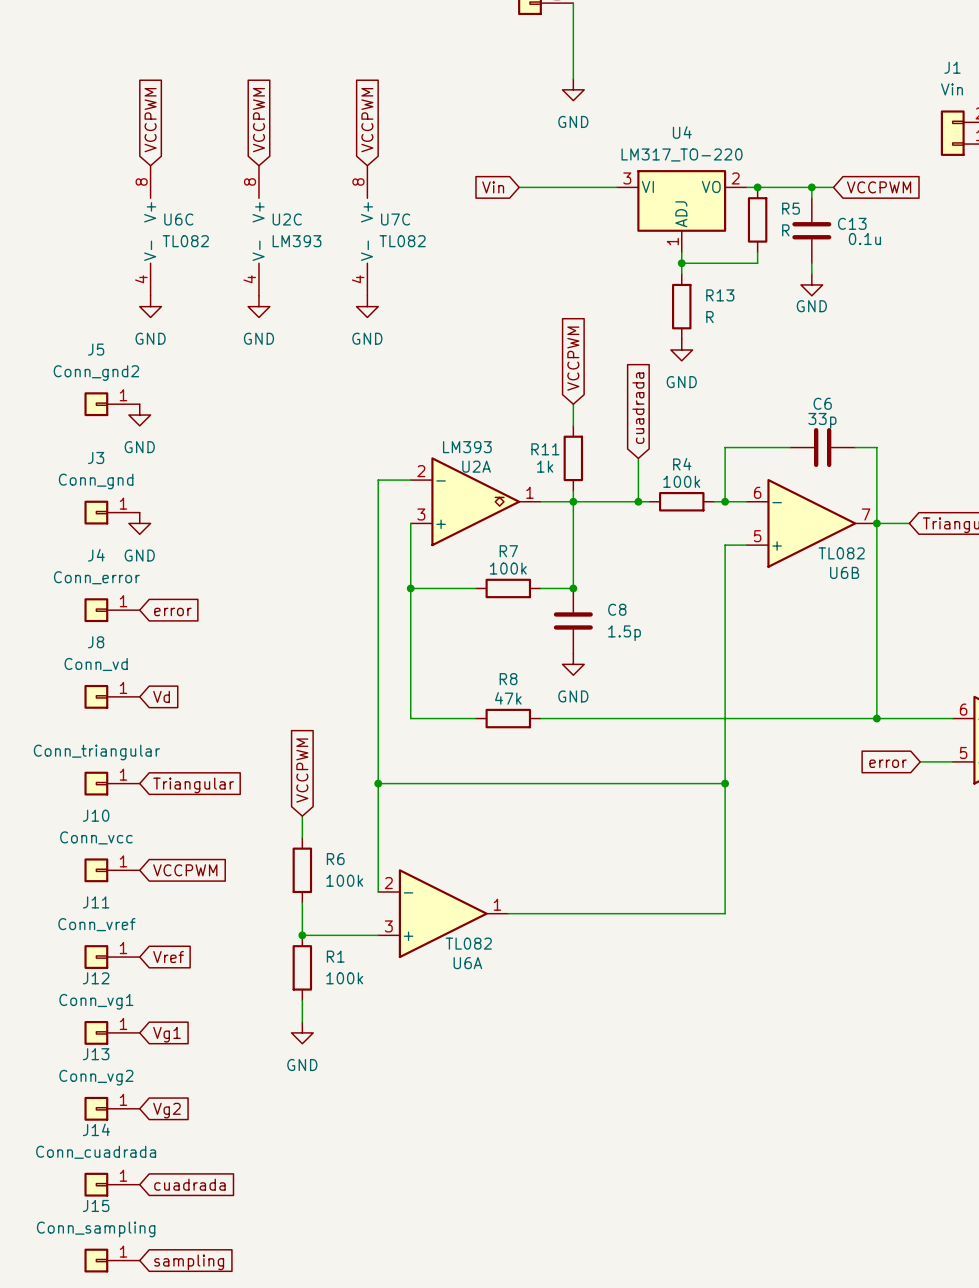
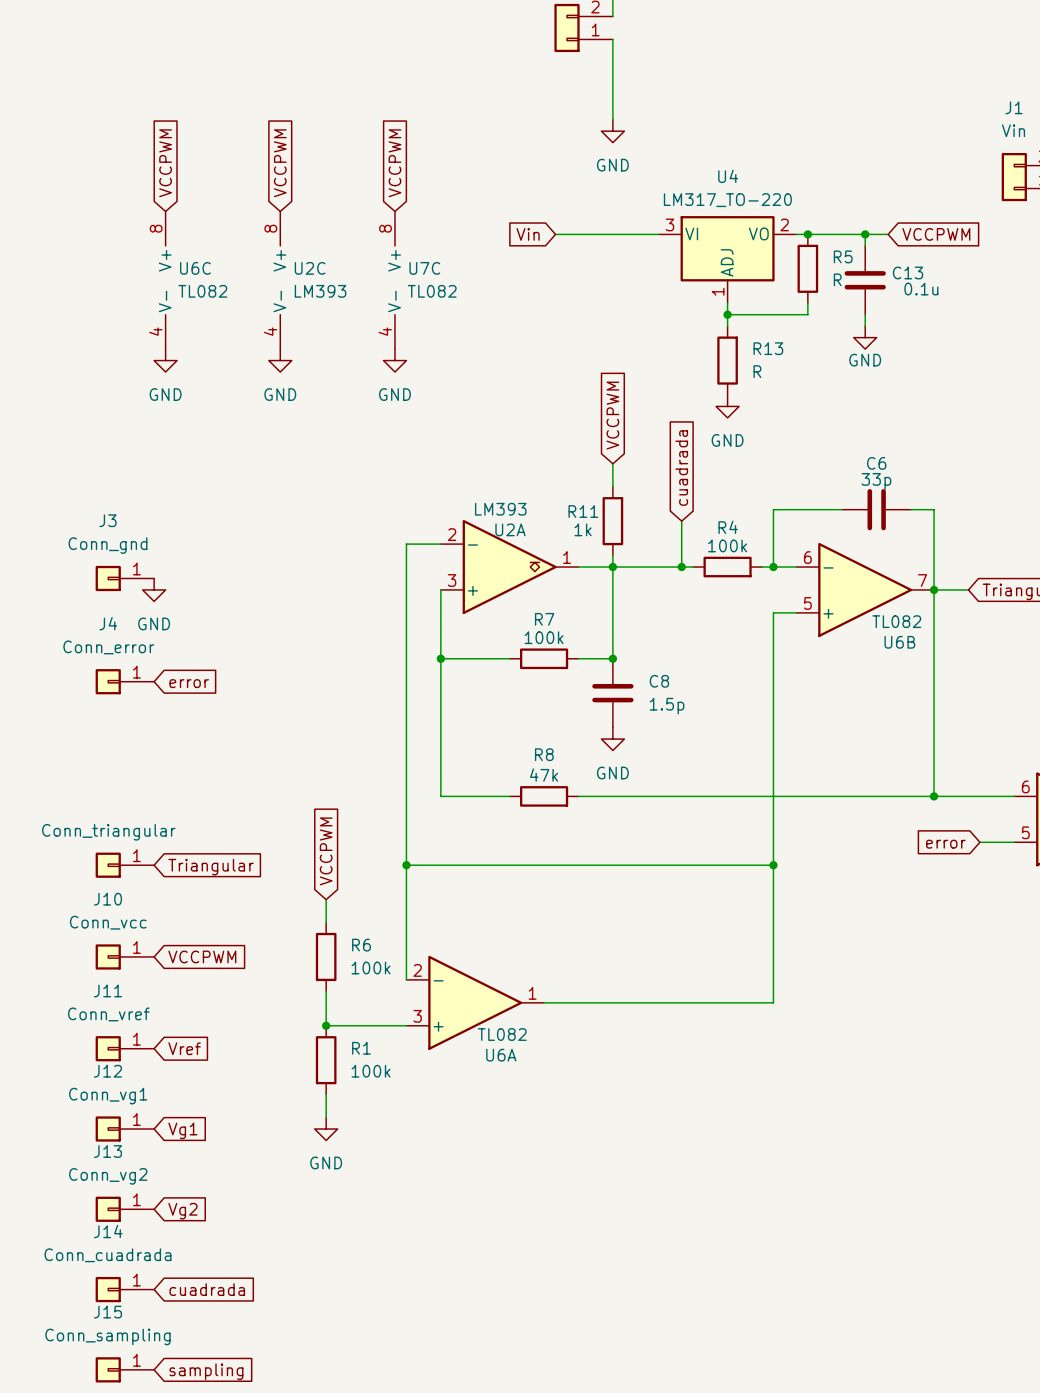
J5: Conn_gnd2 (112, 404) -> none
power symbol: GND (139, 415) -> none
J8: Conn_vd (112, 696) -> none
global label: Vd (161, 696) -> none

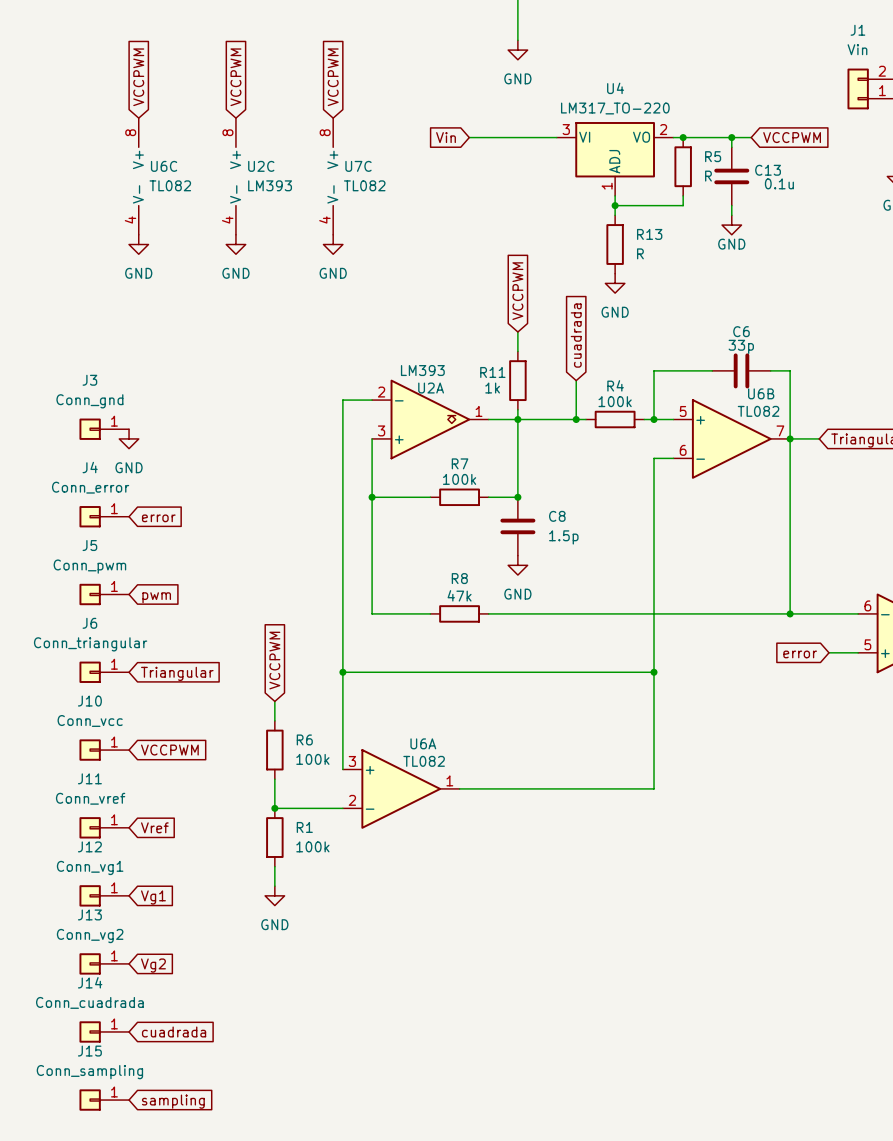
U6B flip: as is (865, 589) -> up-down (731, 438)
J5: none -> Conn_pwm (104, 594)
global label: none -> pwm (156, 597)
J6 name: none -> J6 (89, 623)
U6A flip: as is (475, 1002) -> up-down (401, 788)

